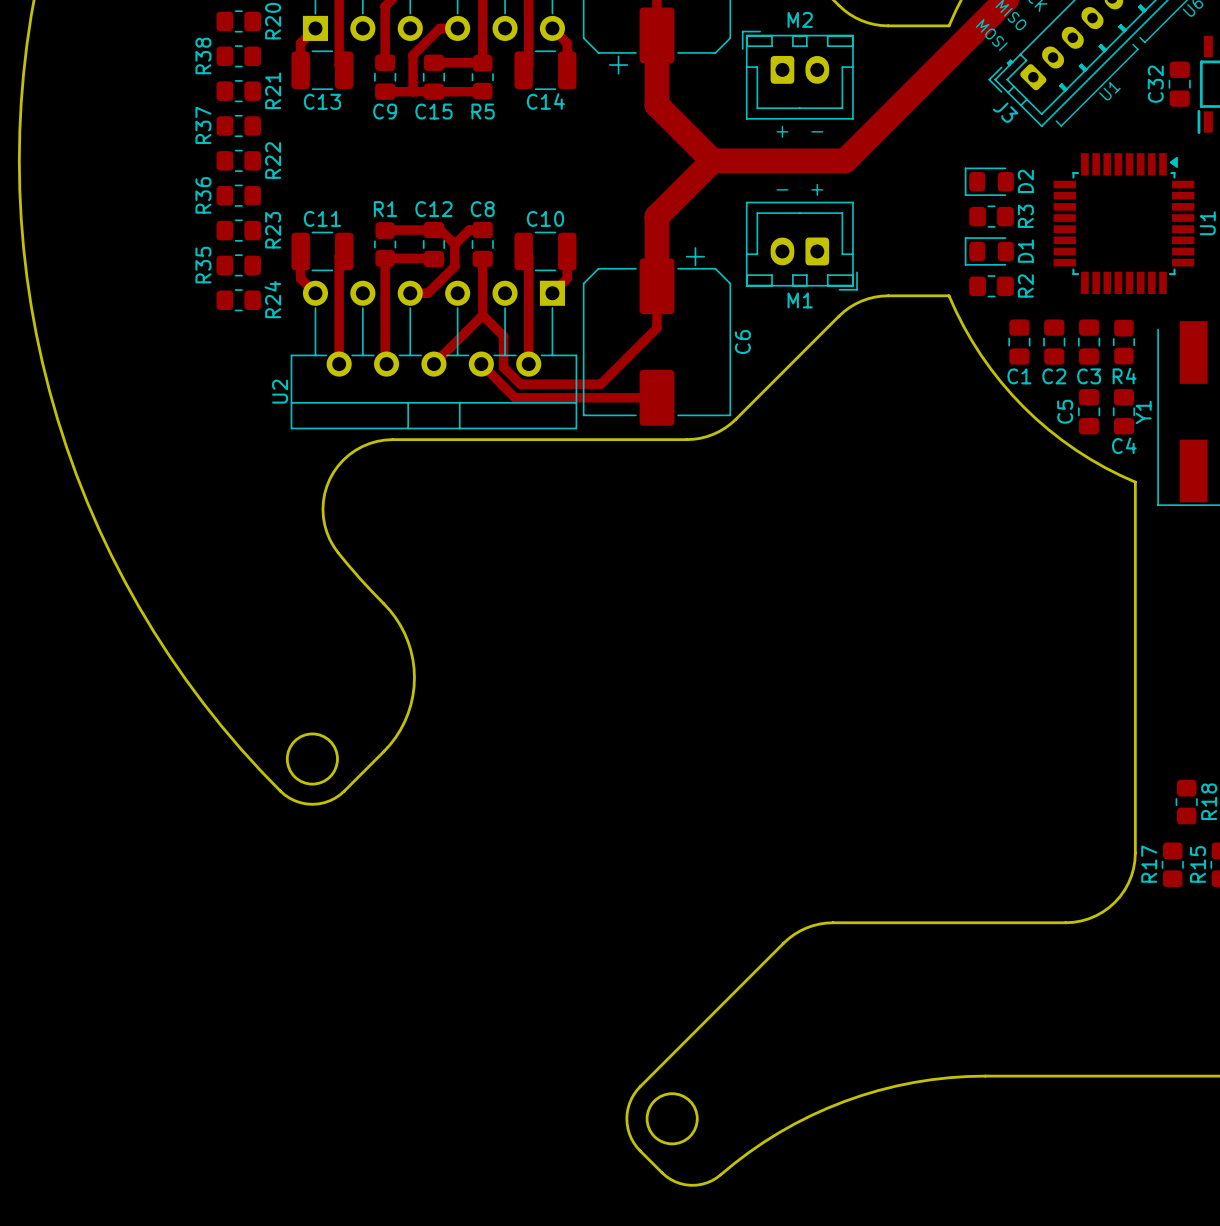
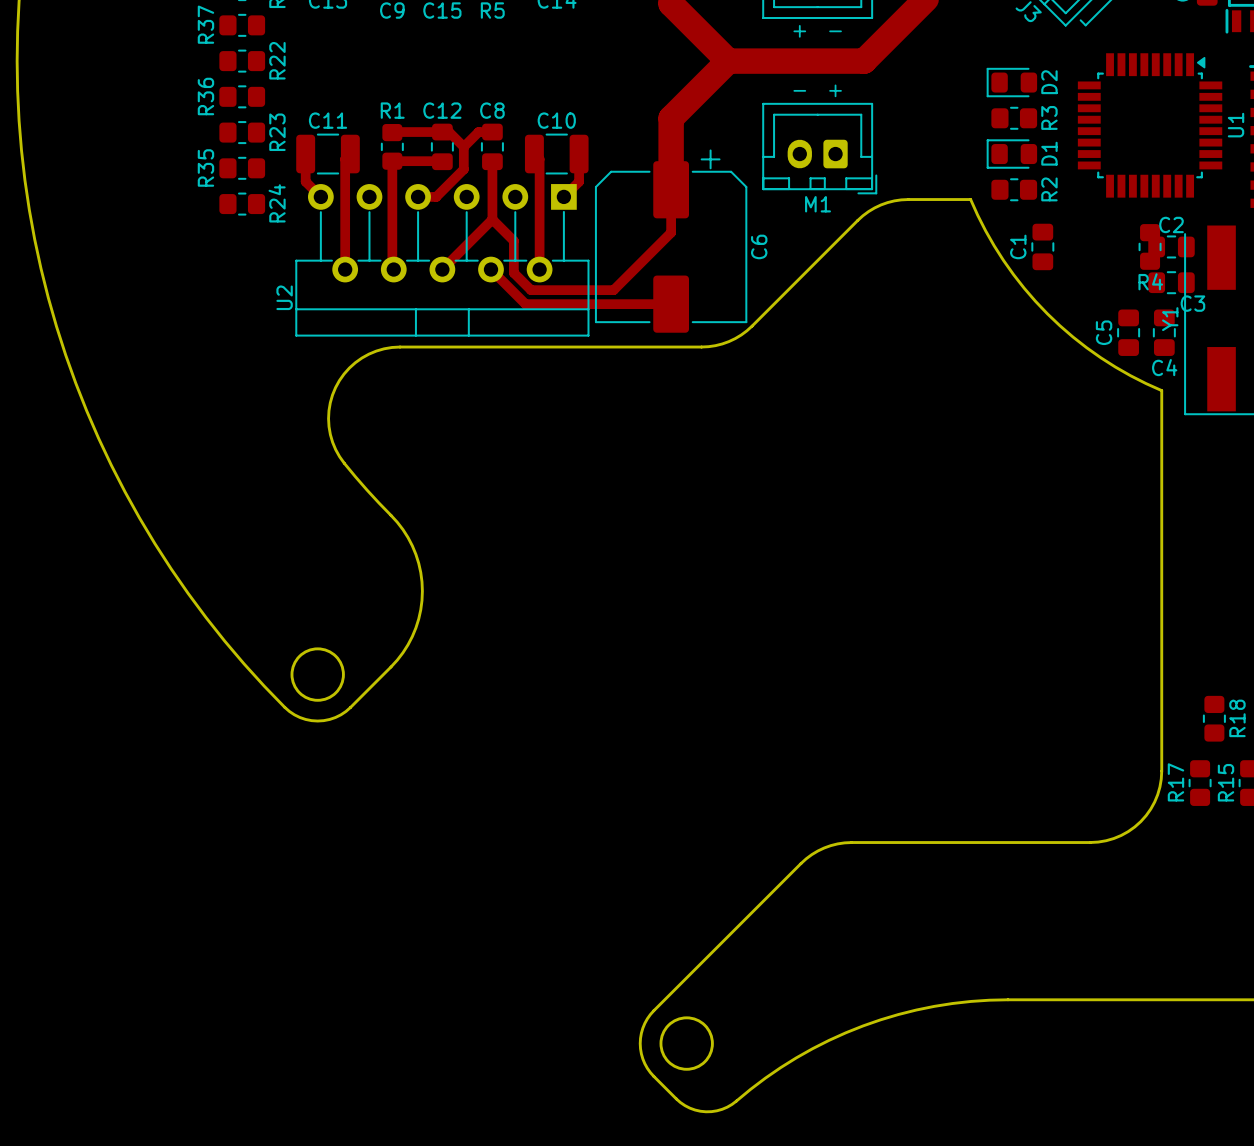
C2 rotation: 0° (1054, 342) -> 90° clockwise (1171, 246)
C2 position: (1054, 342) -> (1171, 246)
C3 rotation: 0° (1089, 342) -> 90° clockwise (1171, 282)
C3 position: (1089, 342) -> (1171, 282)
C1 name rotation: 0° (1019, 376) -> 90° counterclockwise (1018, 246)
C1 name position: C1 (1019, 376) -> C1 (1018, 246)
C2 name position: C2 (1054, 376) -> C2 (1171, 224)
C5 position: (1089, 411) -> (1128, 332)
C4 position: (1123, 411) -> (1164, 332)

